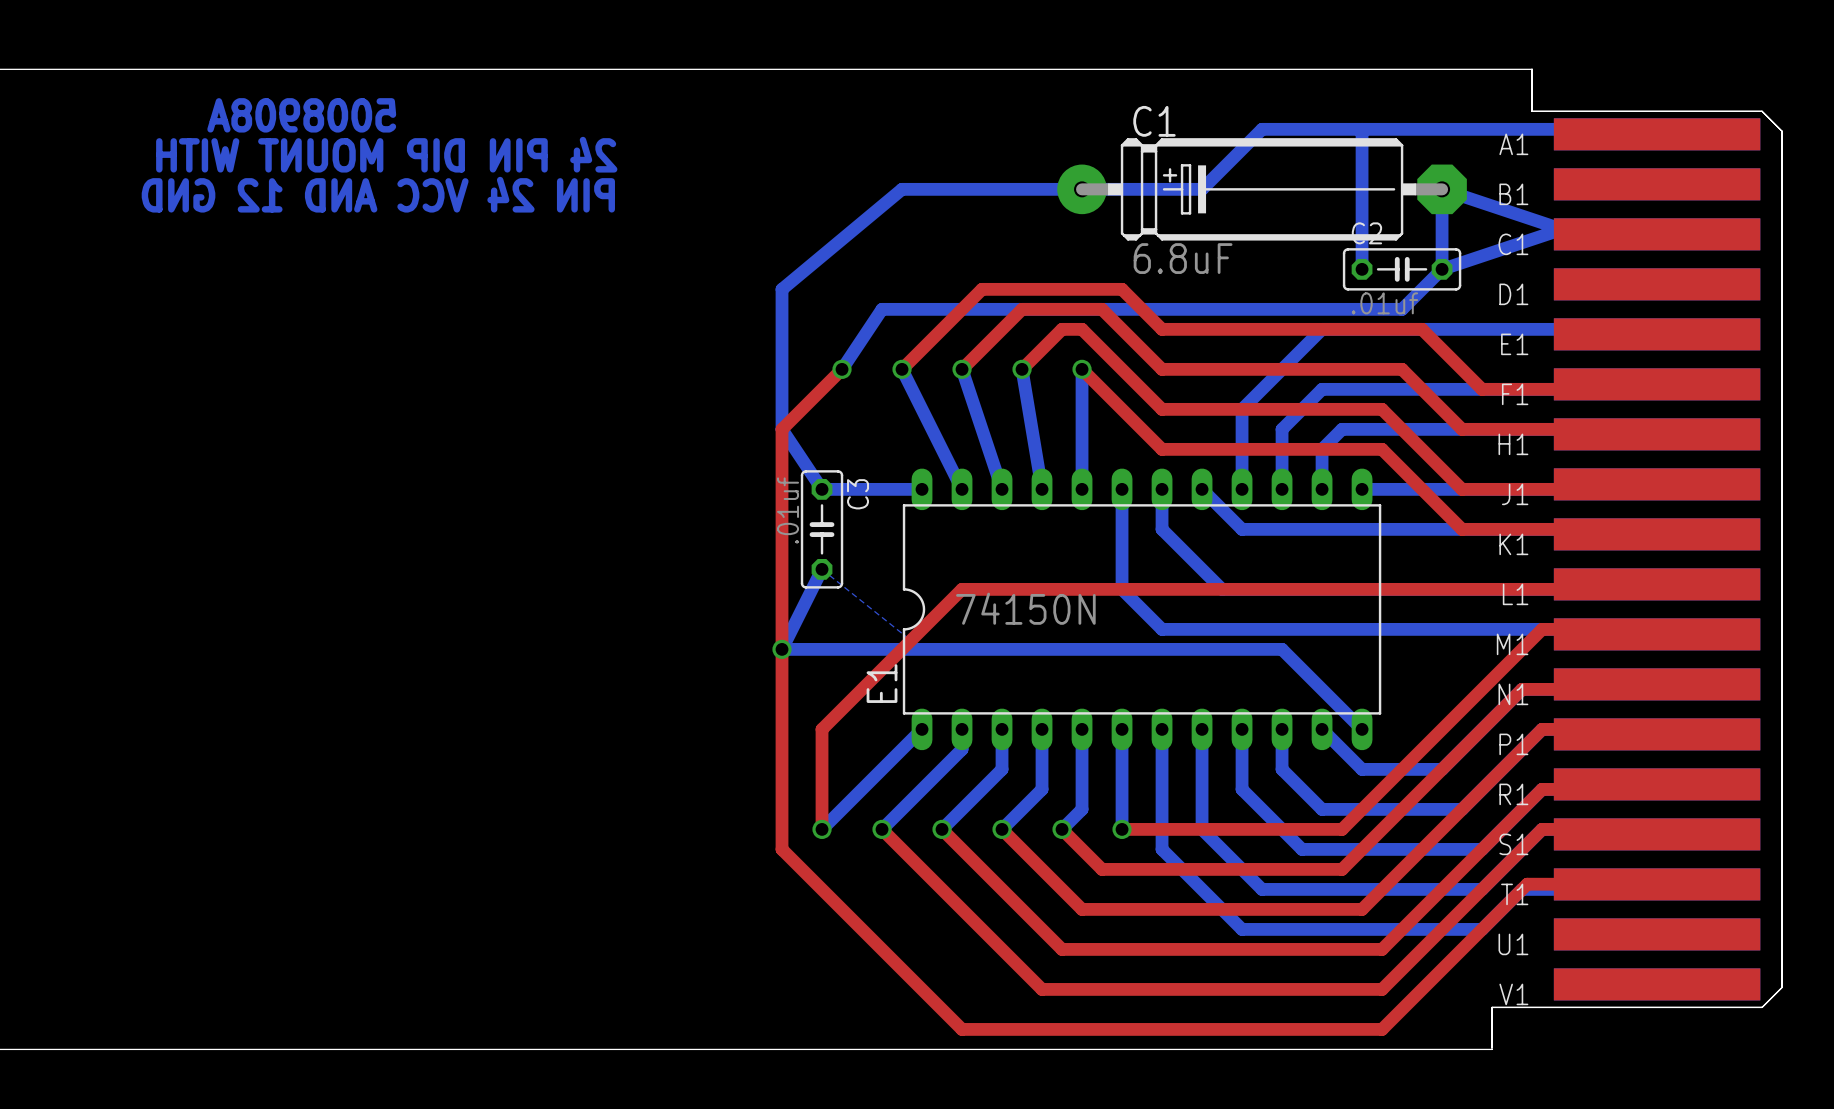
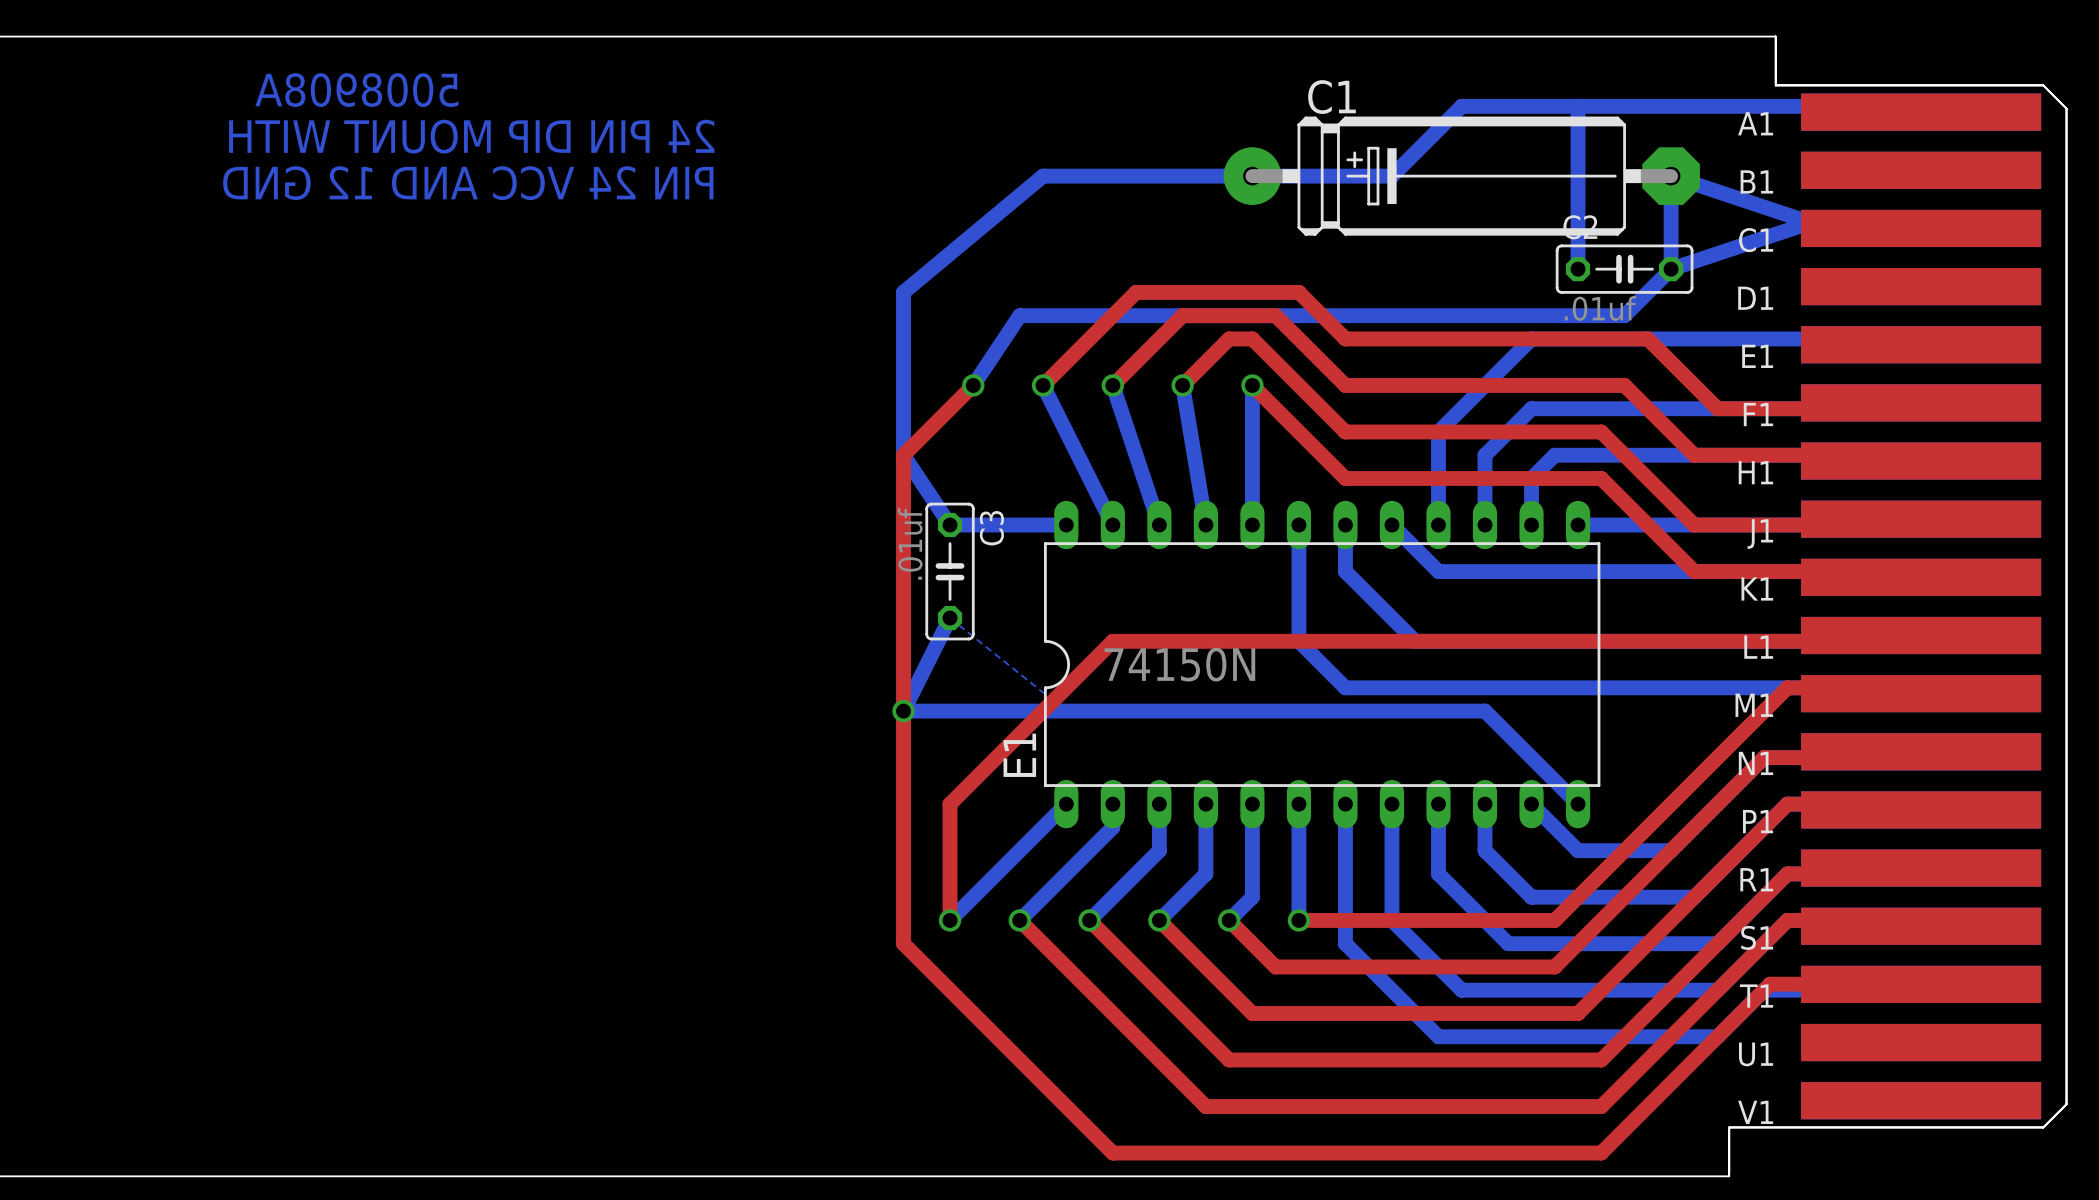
C1 value: 6.8uF (1183, 258) -> none

